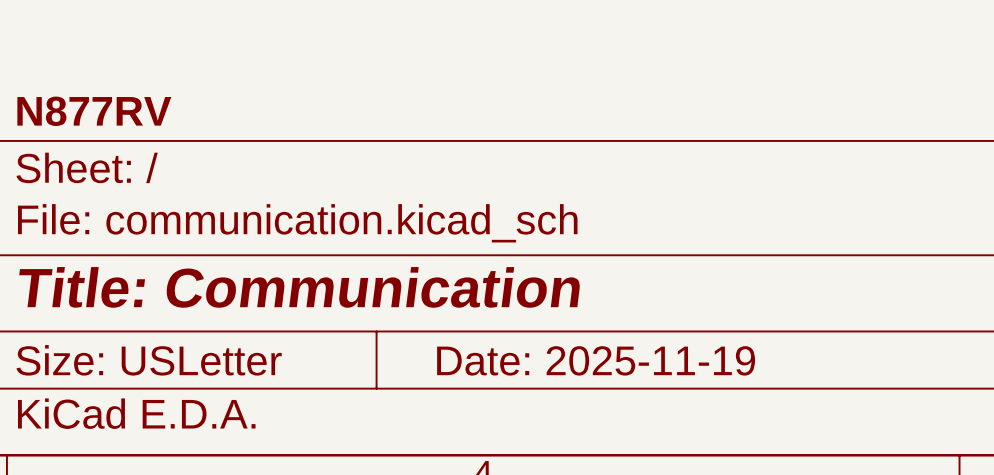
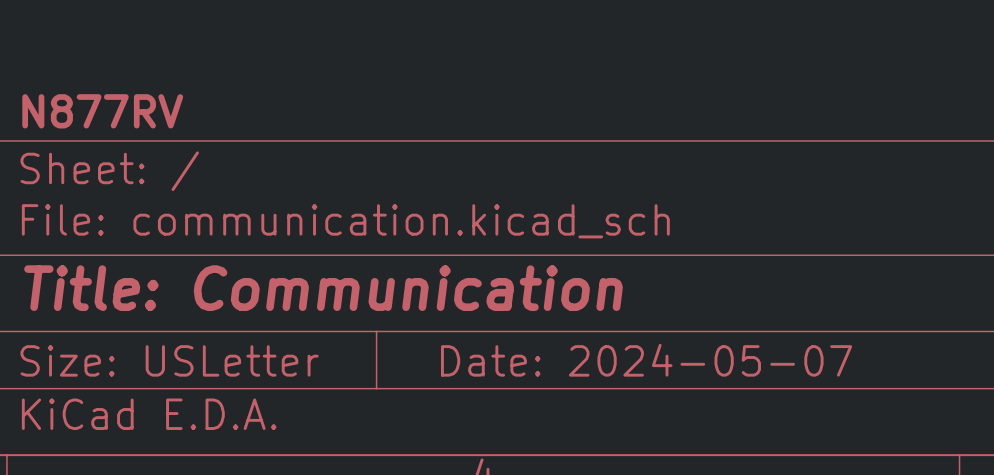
title block: Date: 2025-11-19 (596, 360) -> Date: 2024-05-07 (646, 360)

